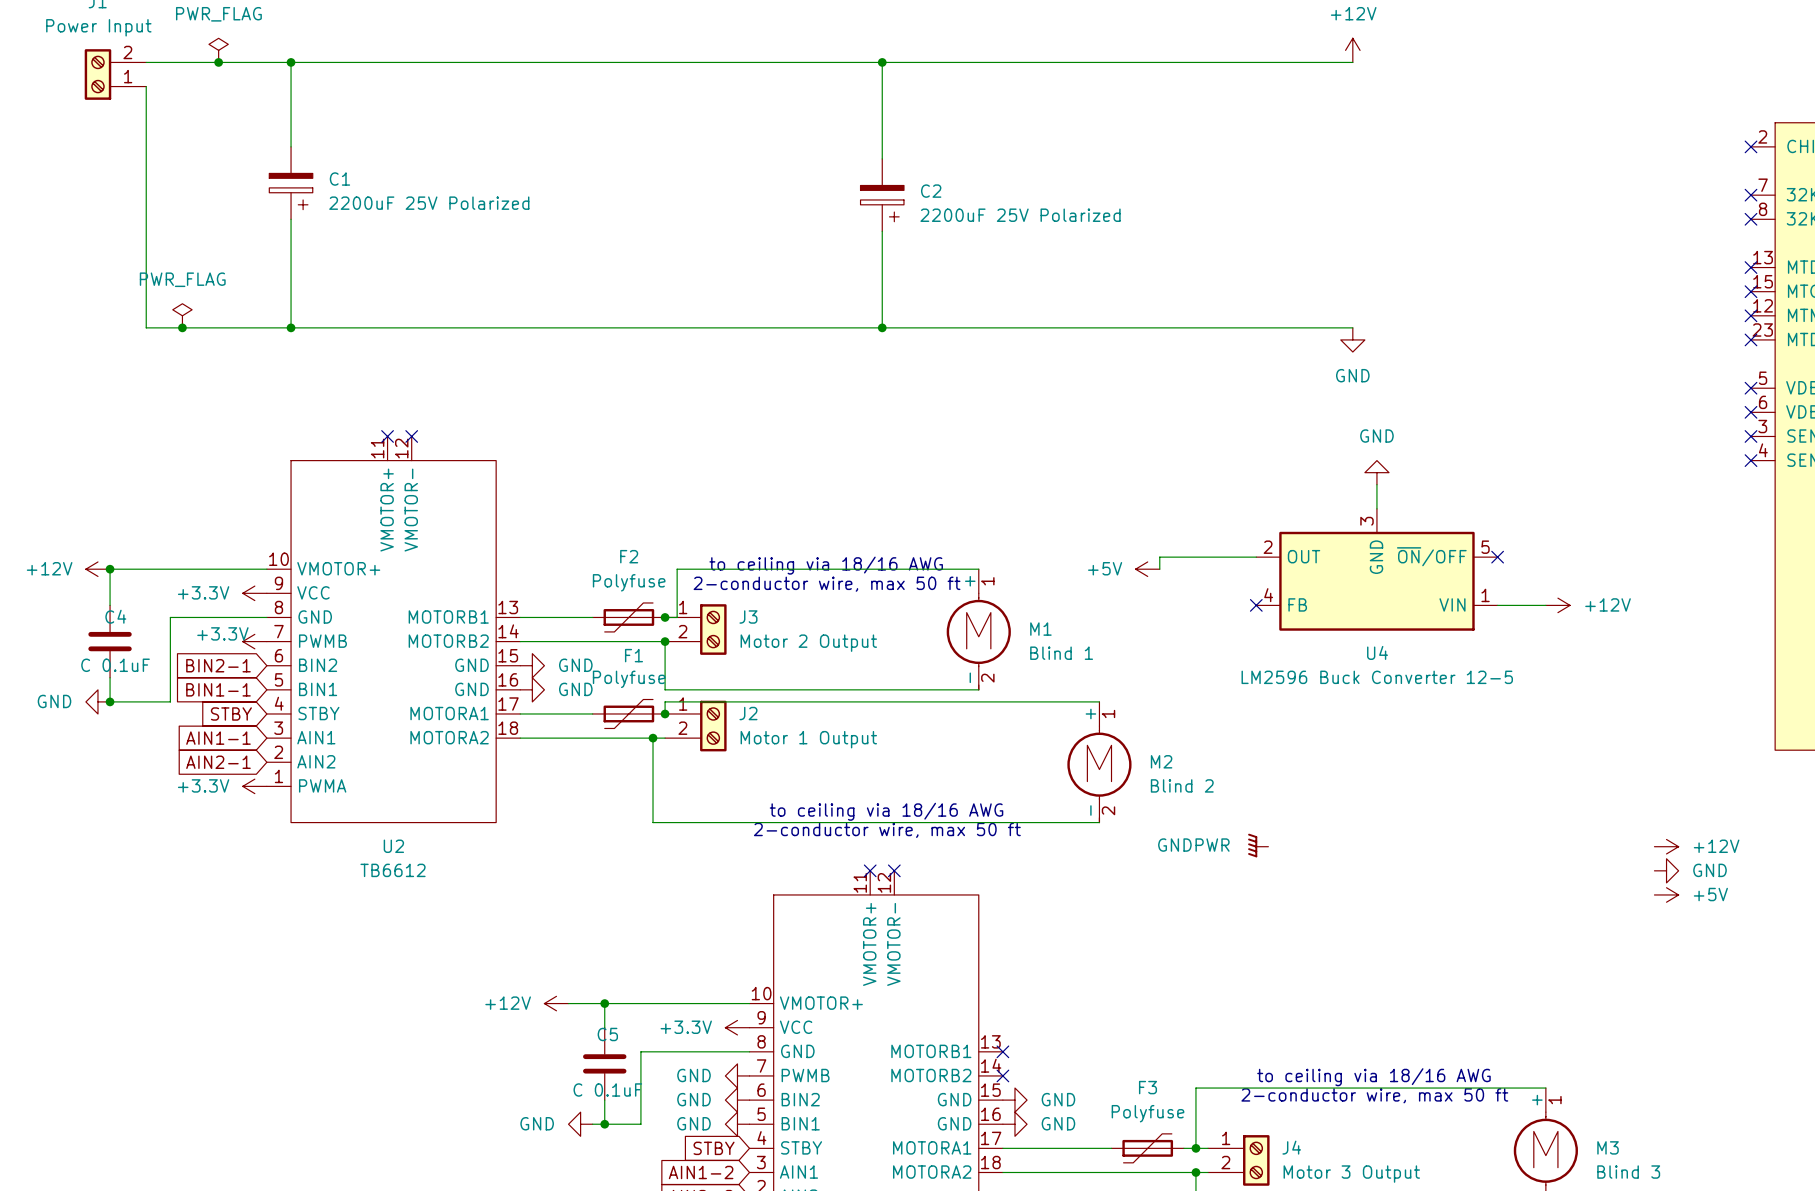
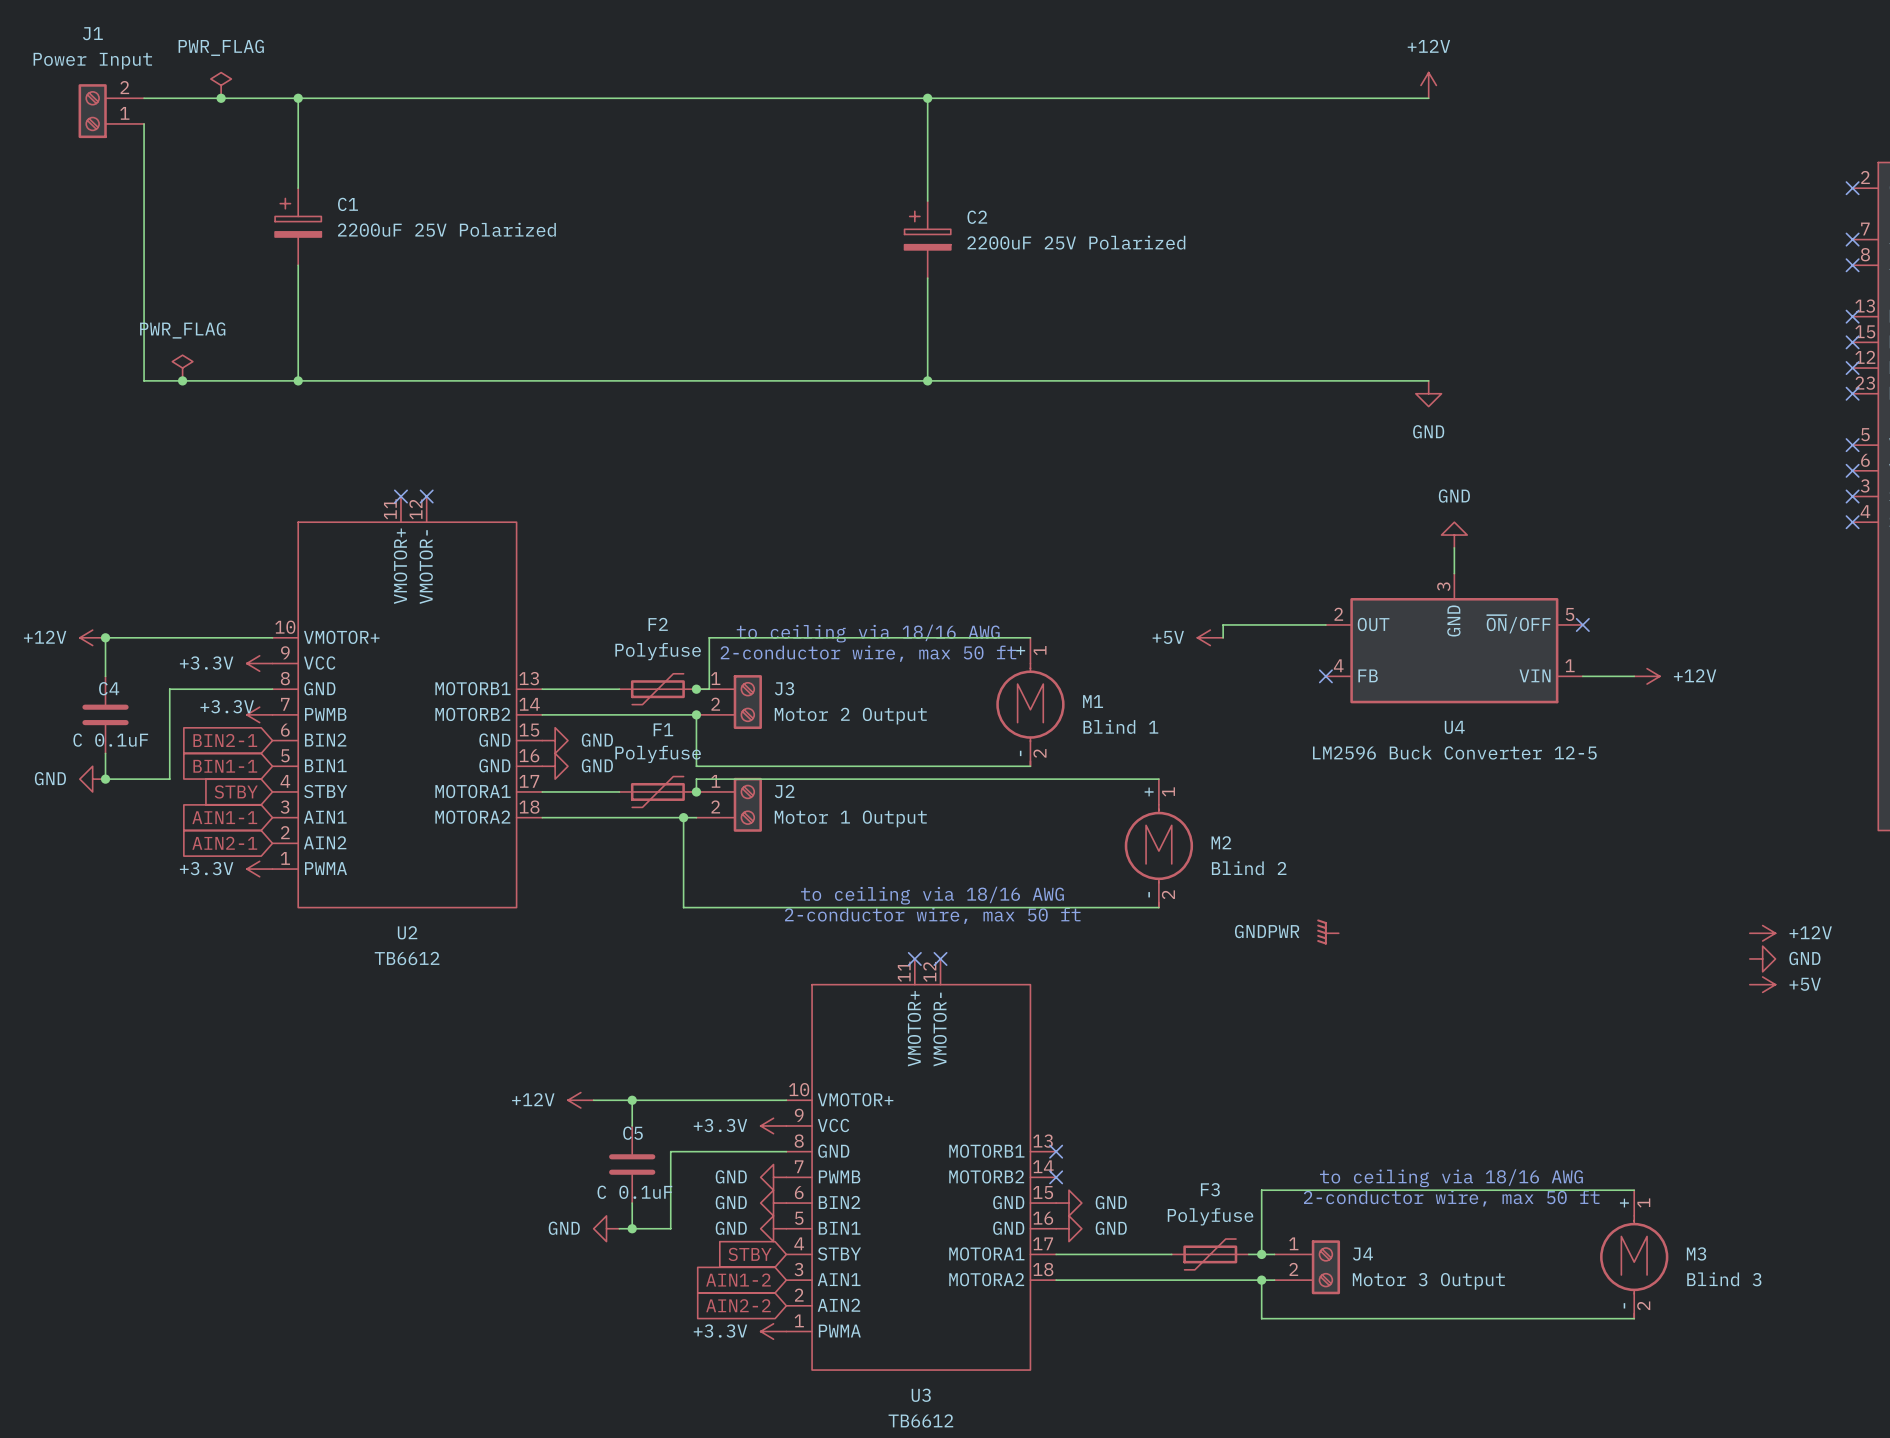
C1 rotation: 0° (291, 191) -> 180° (298, 217)
C2 rotation: 0° (882, 203) -> 180° (927, 230)

